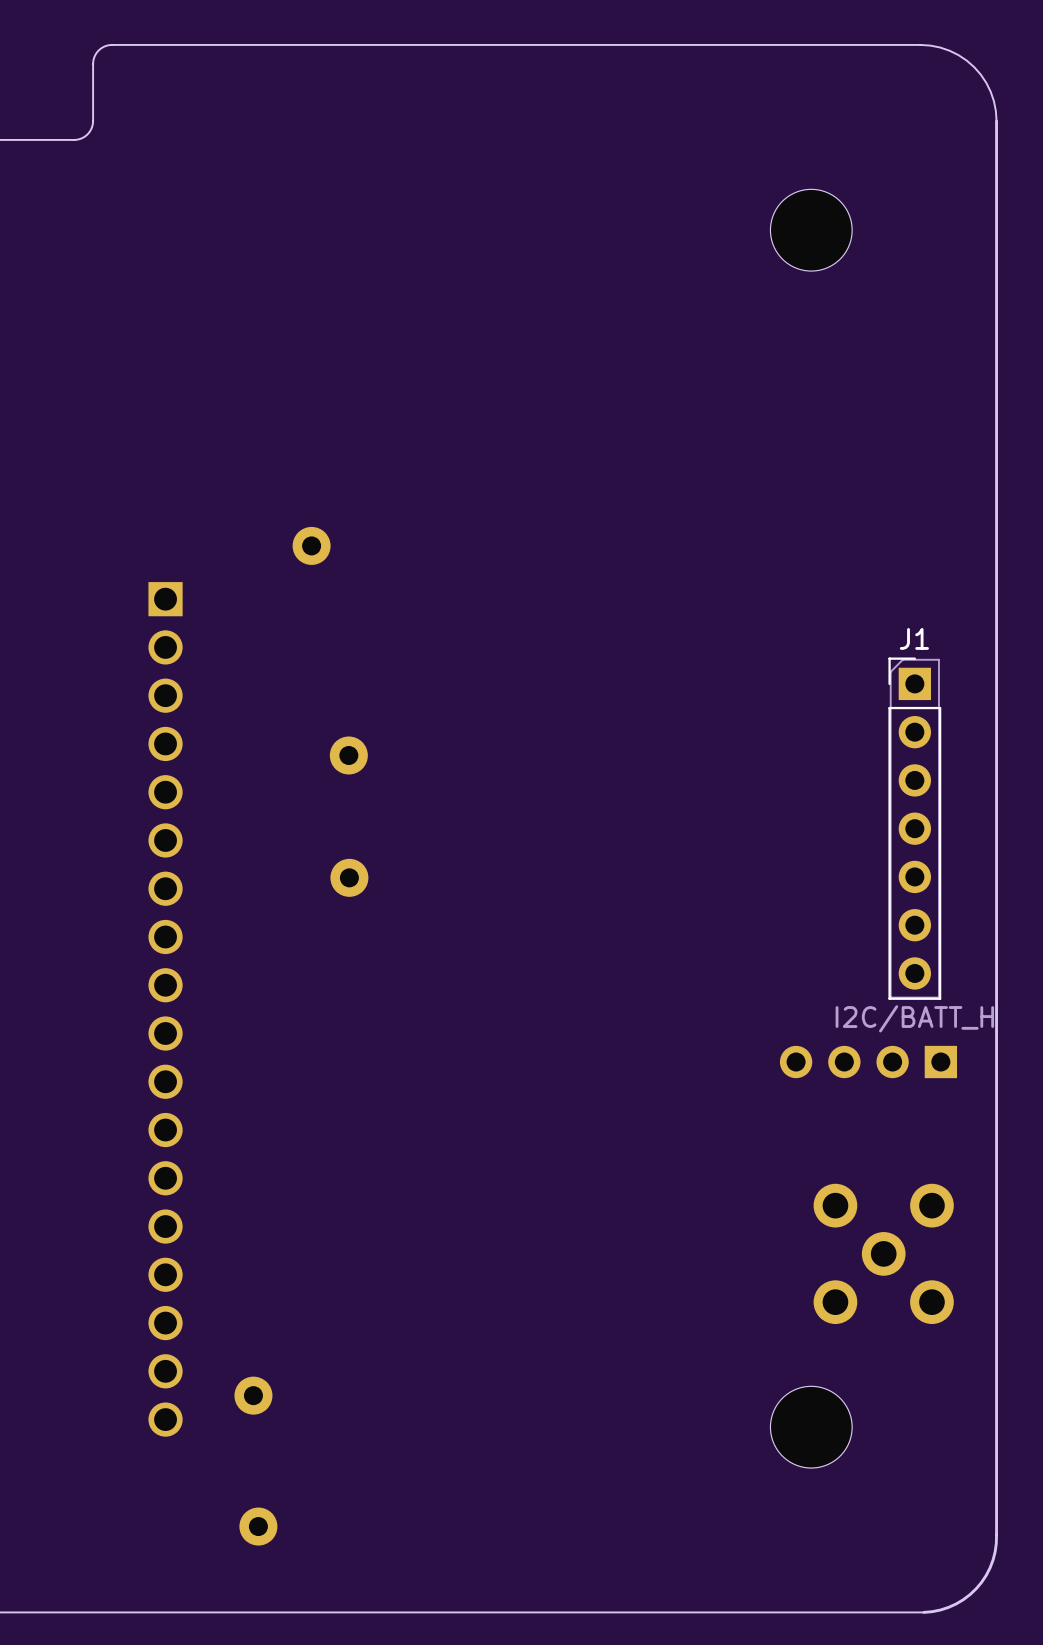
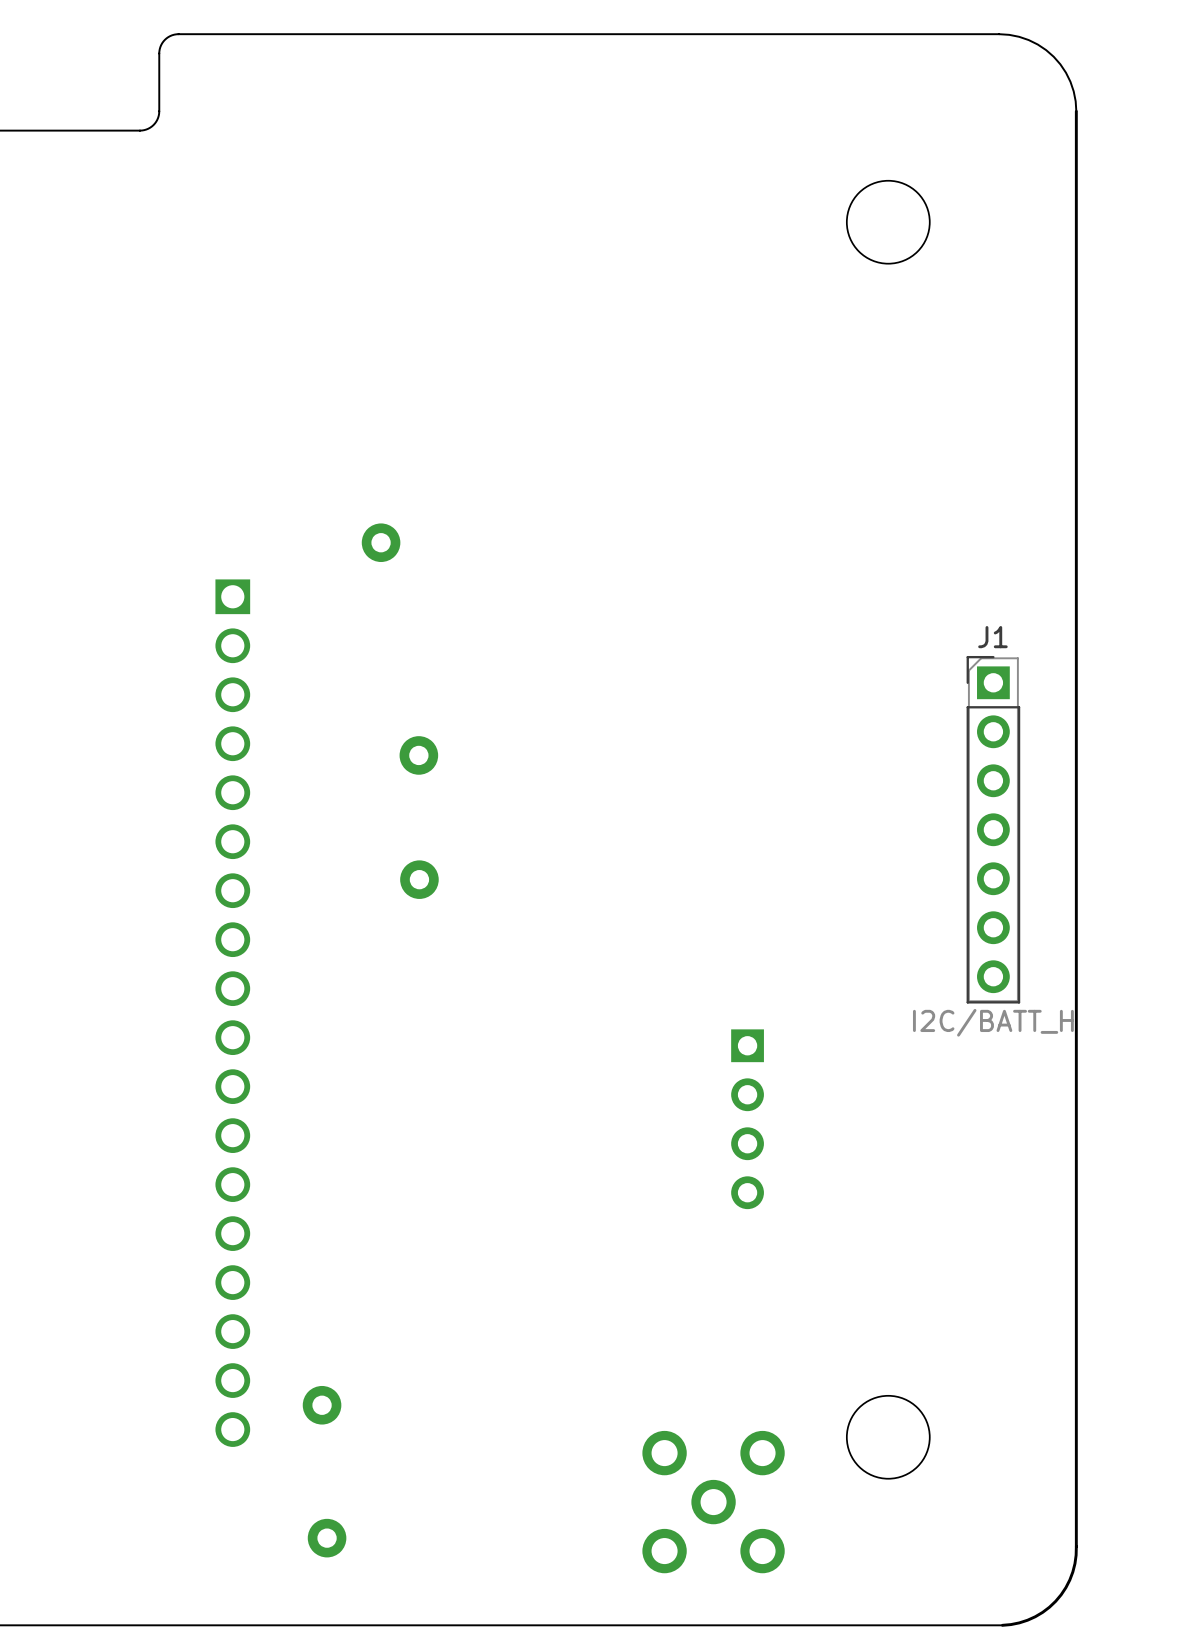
part rotation: 0° (868, 1062) -> 90° counterclockwise (747, 1119)
part position: (868, 1062) -> (747, 1119)
part position: (883, 1253) -> (713, 1502)

